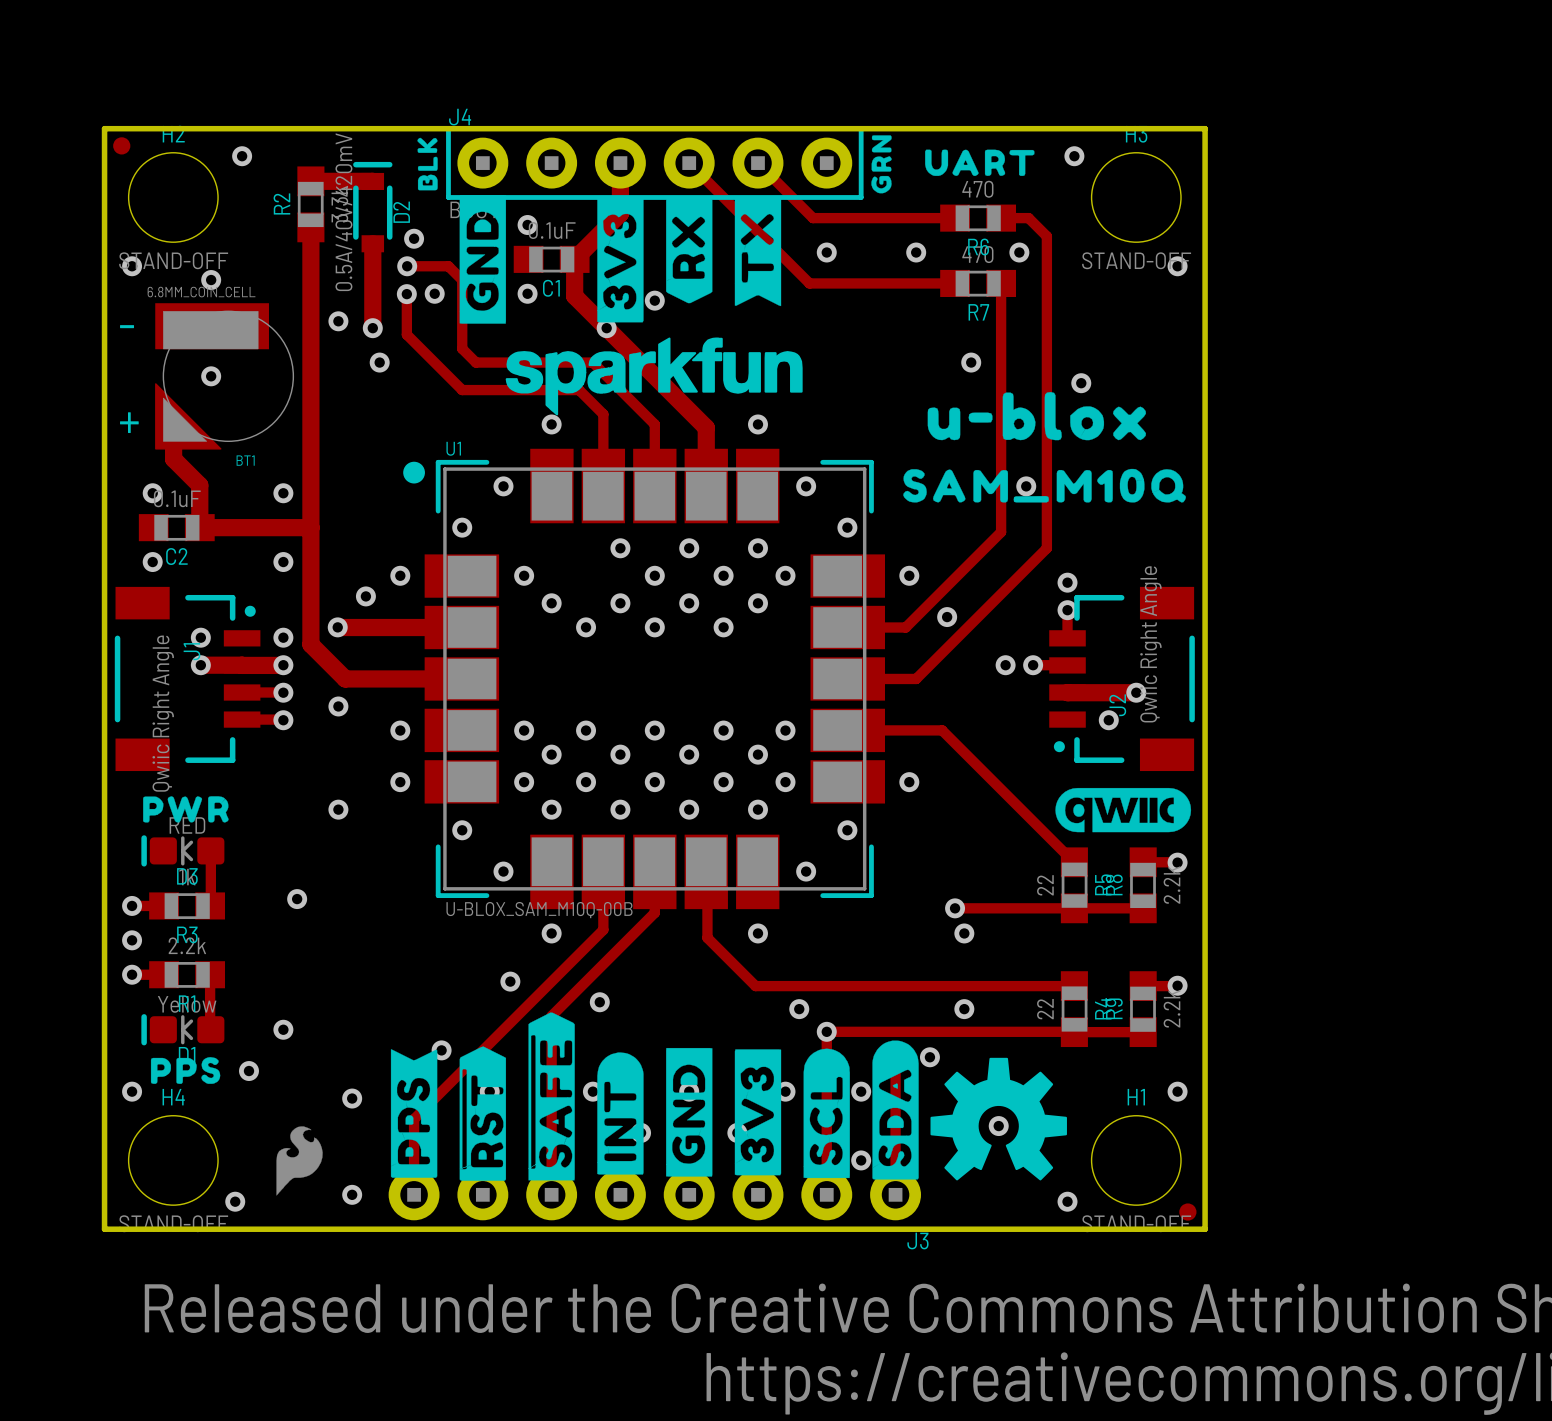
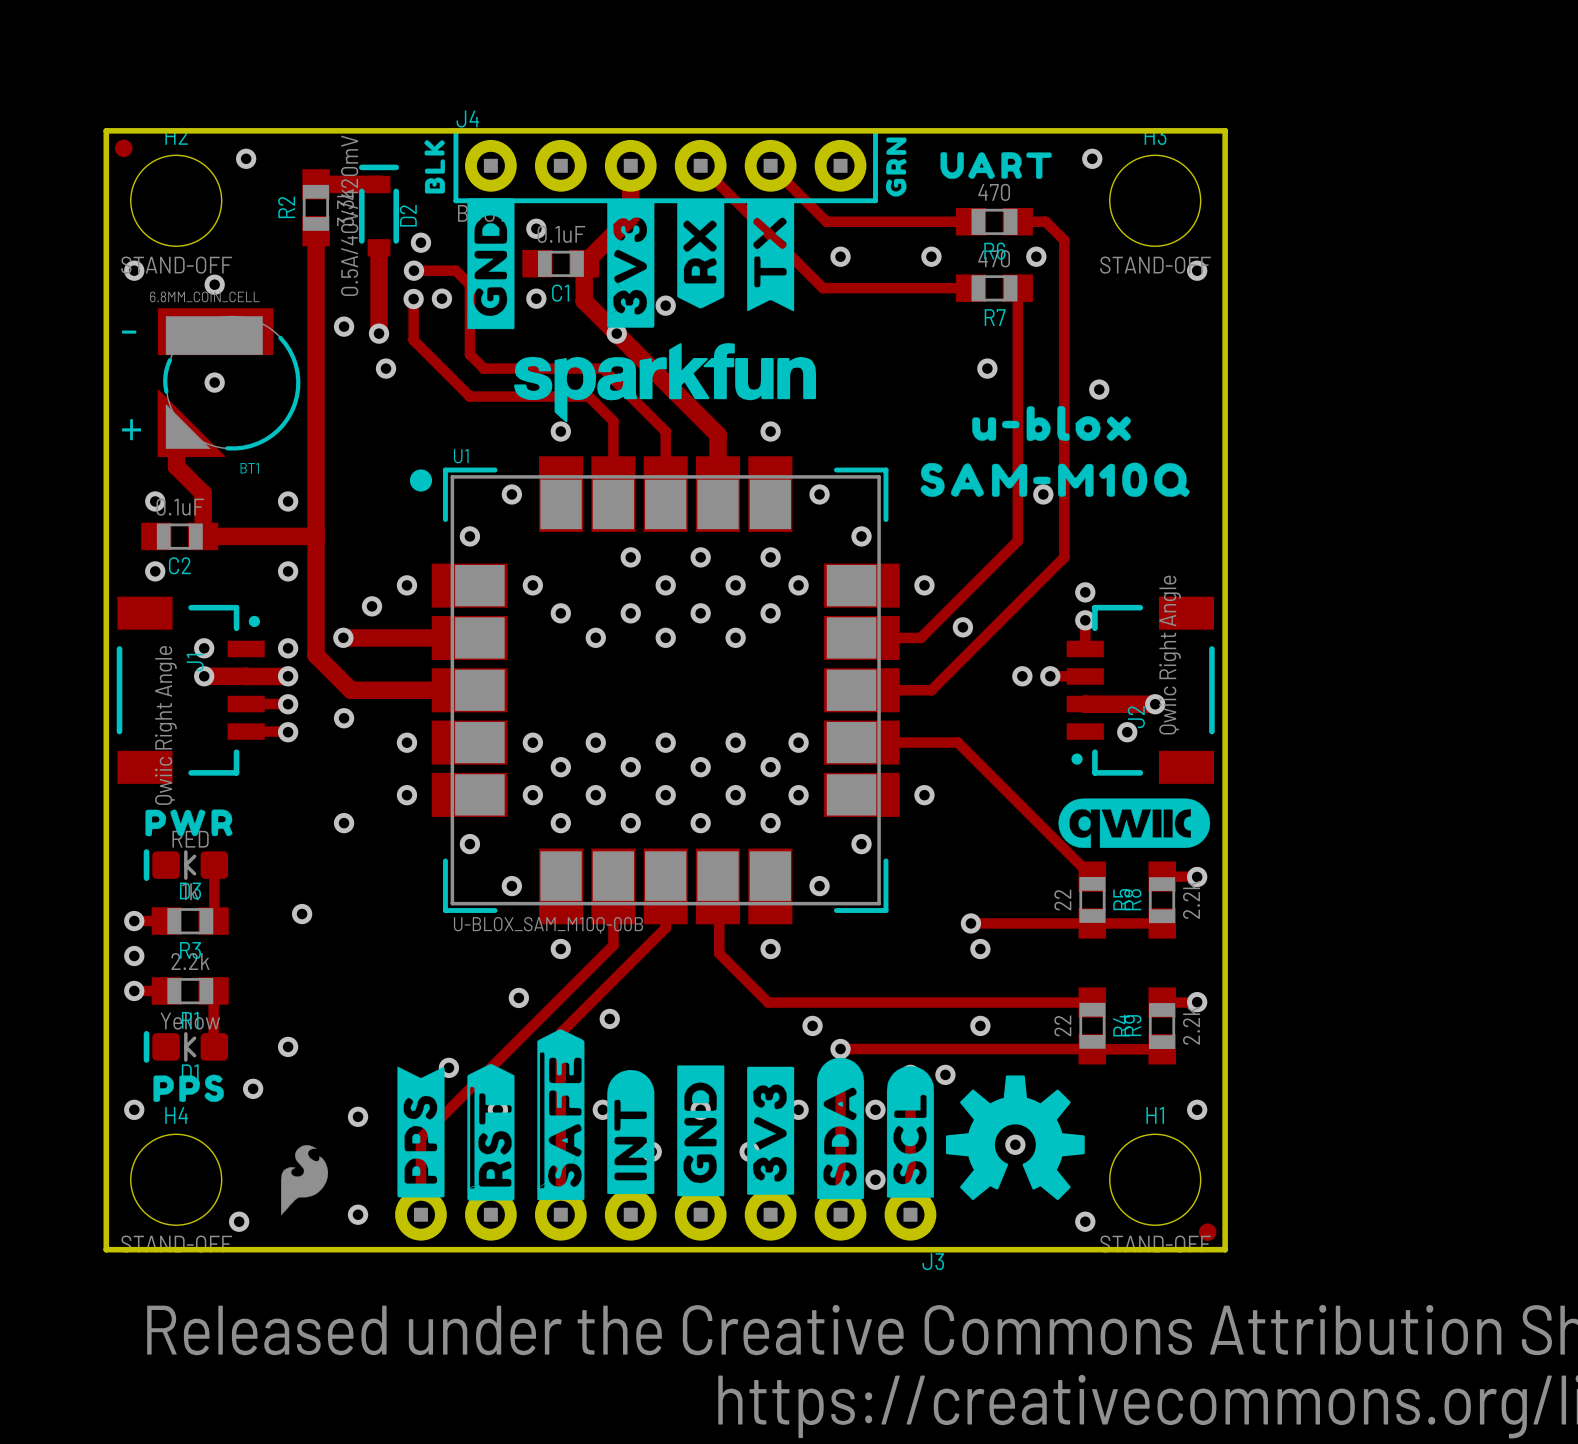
BT1 footprint: [155, 303, 295, 450] -> [157, 308, 301, 458]
drawing shape: [927, 391, 1147, 441] -> [972, 405, 1131, 441]
drawing shape: [903, 468, 1186, 503] -> [920, 462, 1190, 497]
drawing shape: [1055, 787, 1192, 833] -> [1058, 798, 1211, 848]
drawing position: (895, 1110) -> (840, 1128)
drawing position: (826, 1113) -> (910, 1131)

